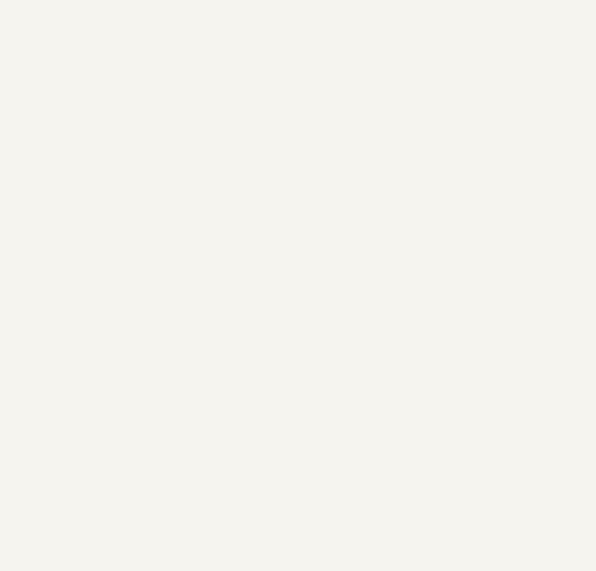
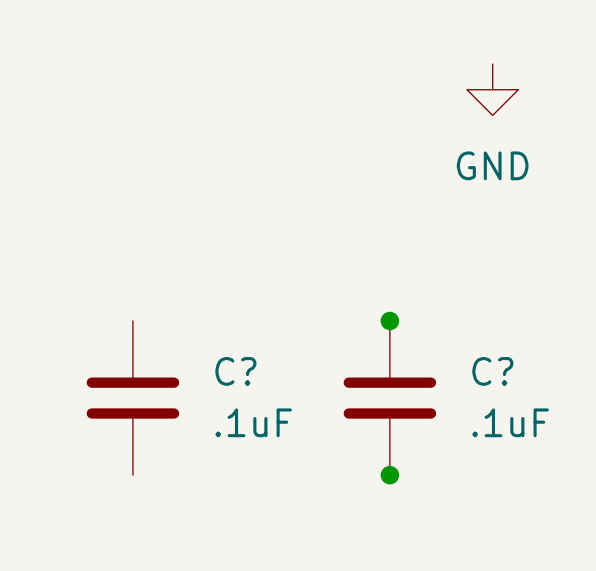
power symbol: none -> GND (492, 89)
junction: none -> (389, 320)
C?: none -> .1uF (132, 398)
C?: none -> .1uF (389, 398)
junction: none -> (389, 475)

